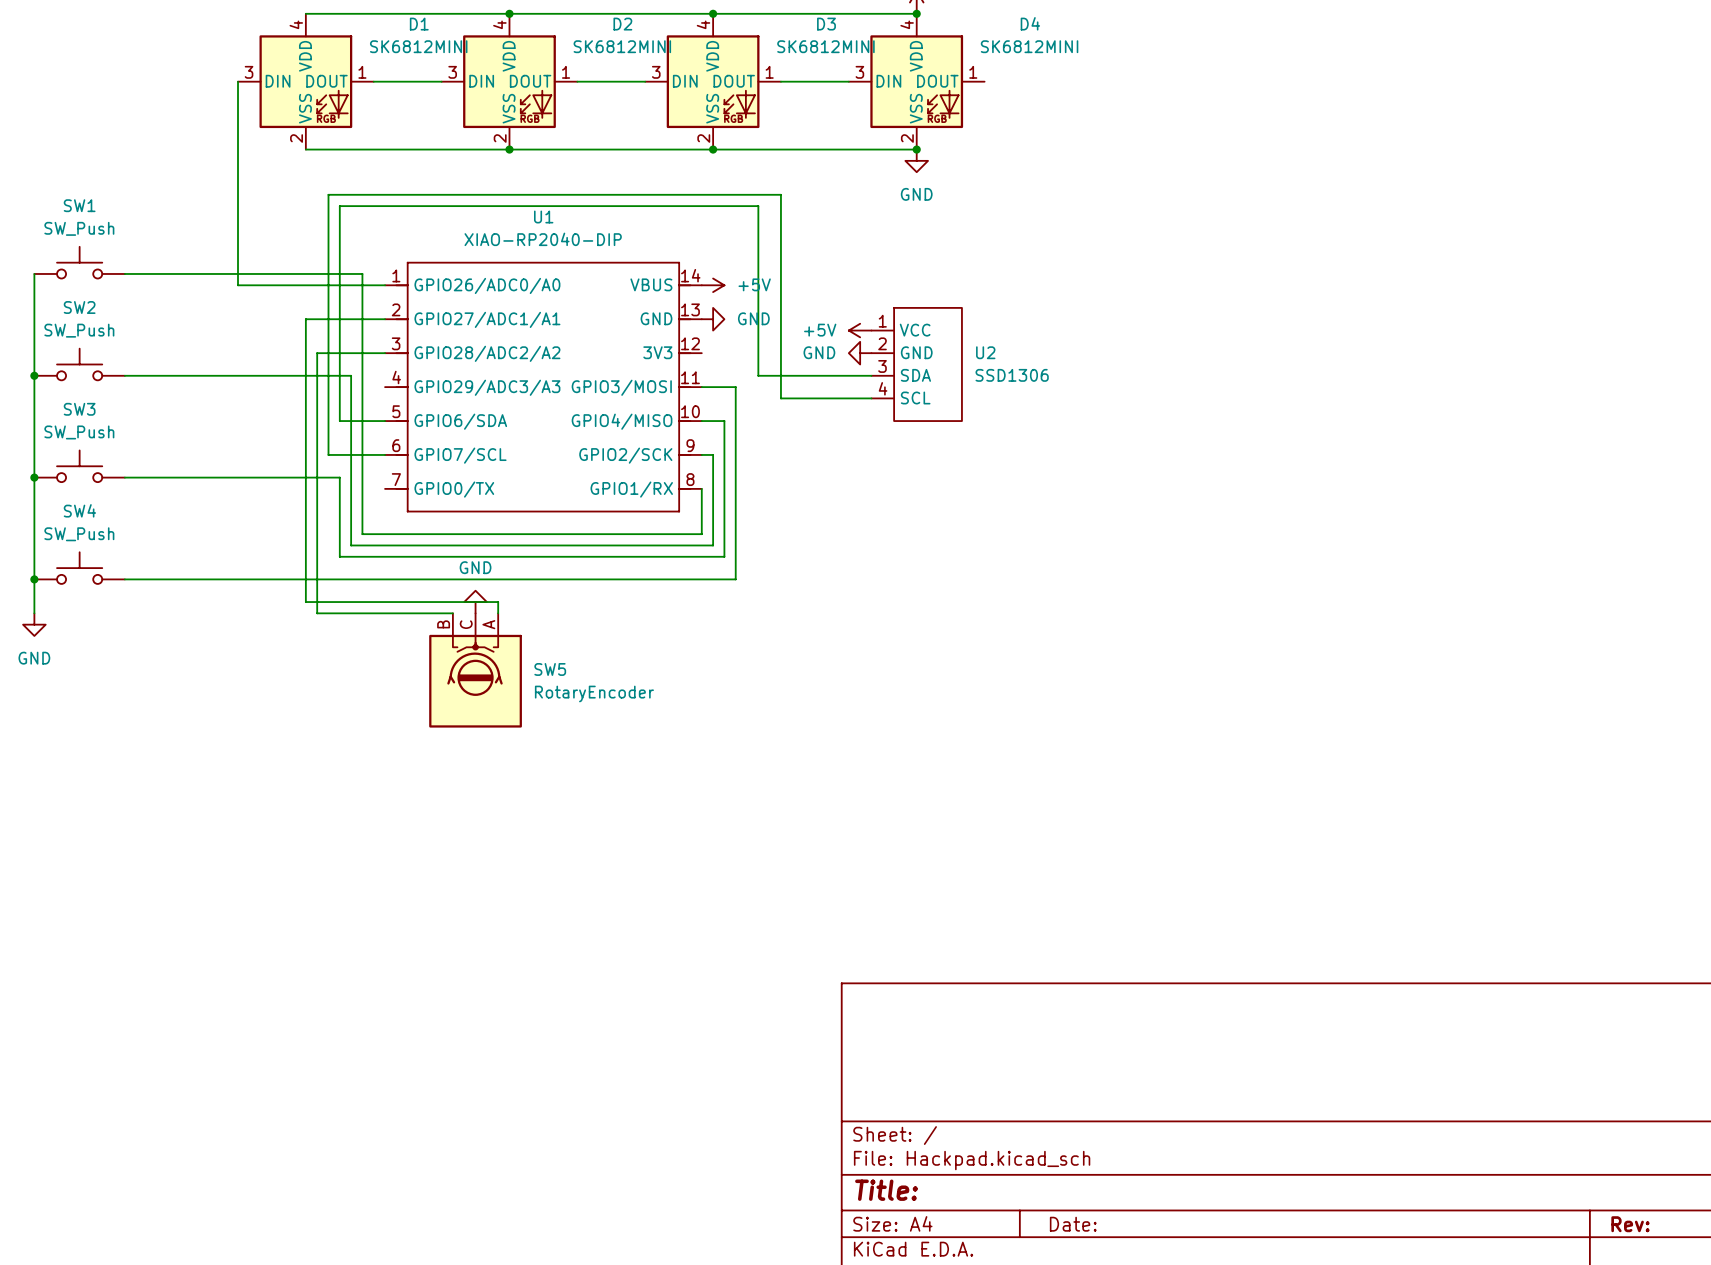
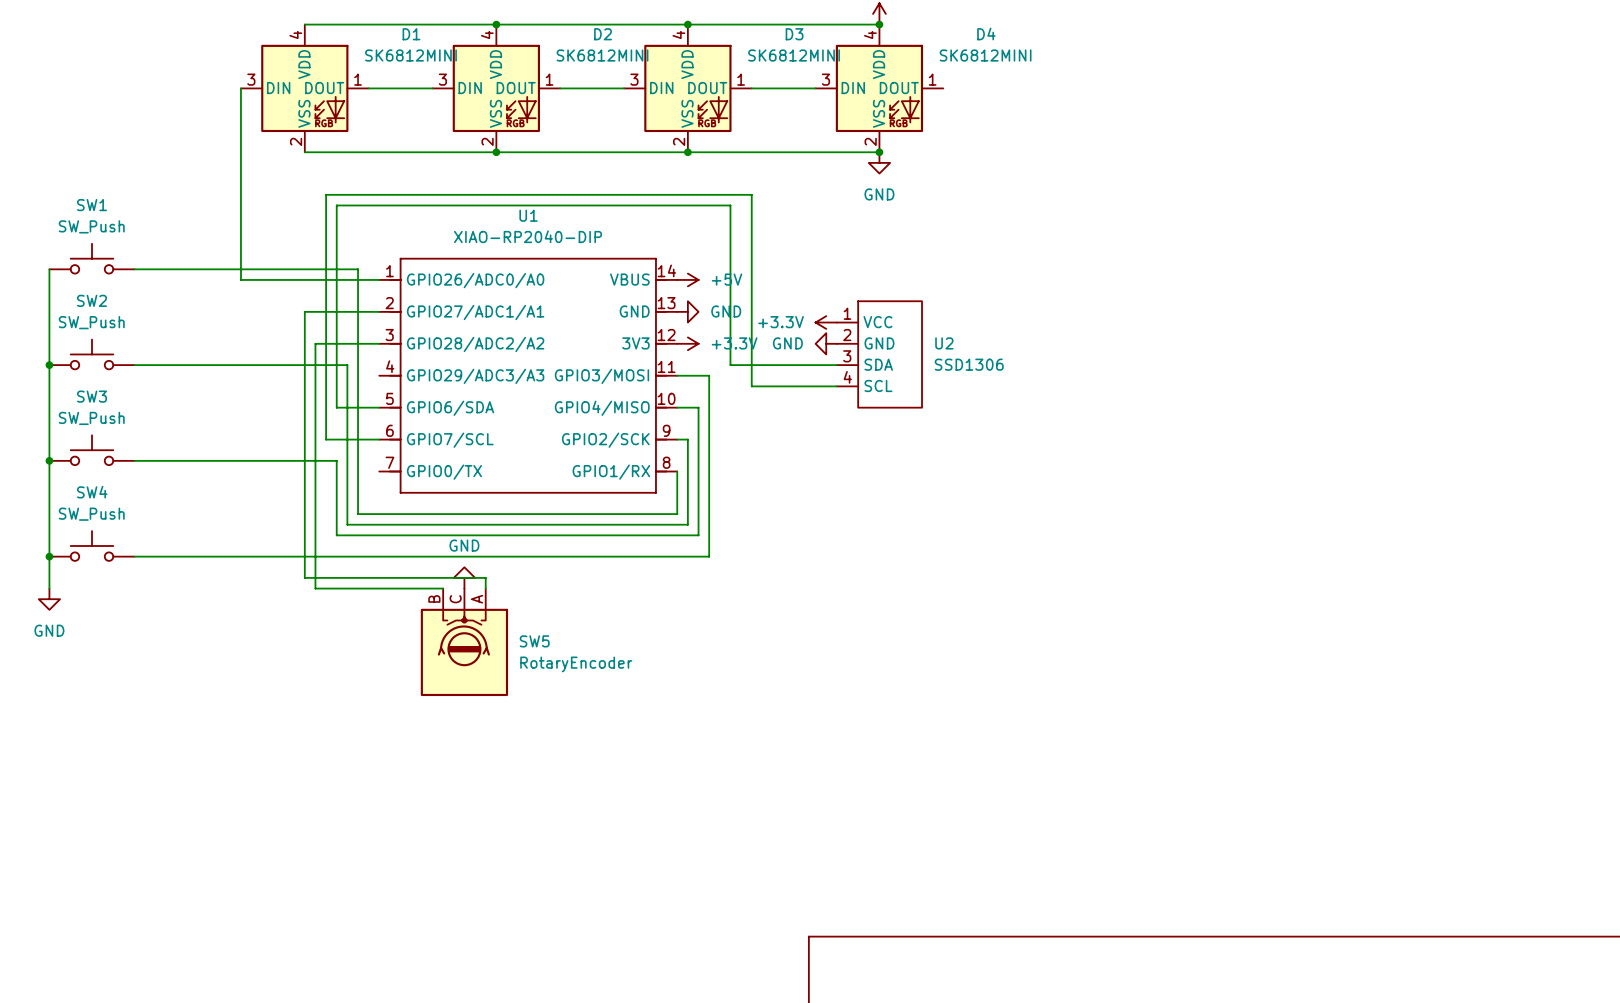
power symbol: +5V (860, 330) -> +3.3V (826, 322)
power symbol: none -> +3.3V (687, 343)

